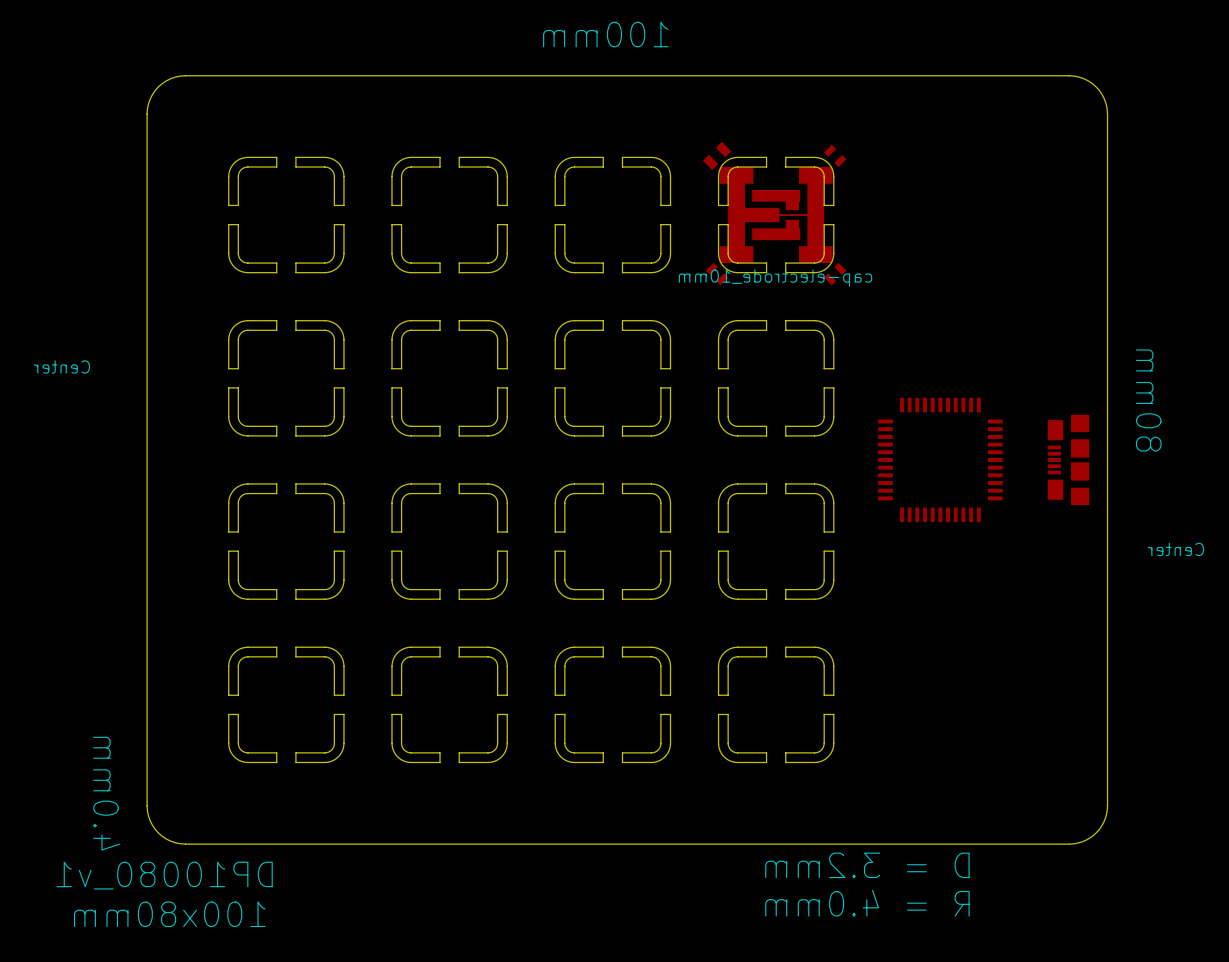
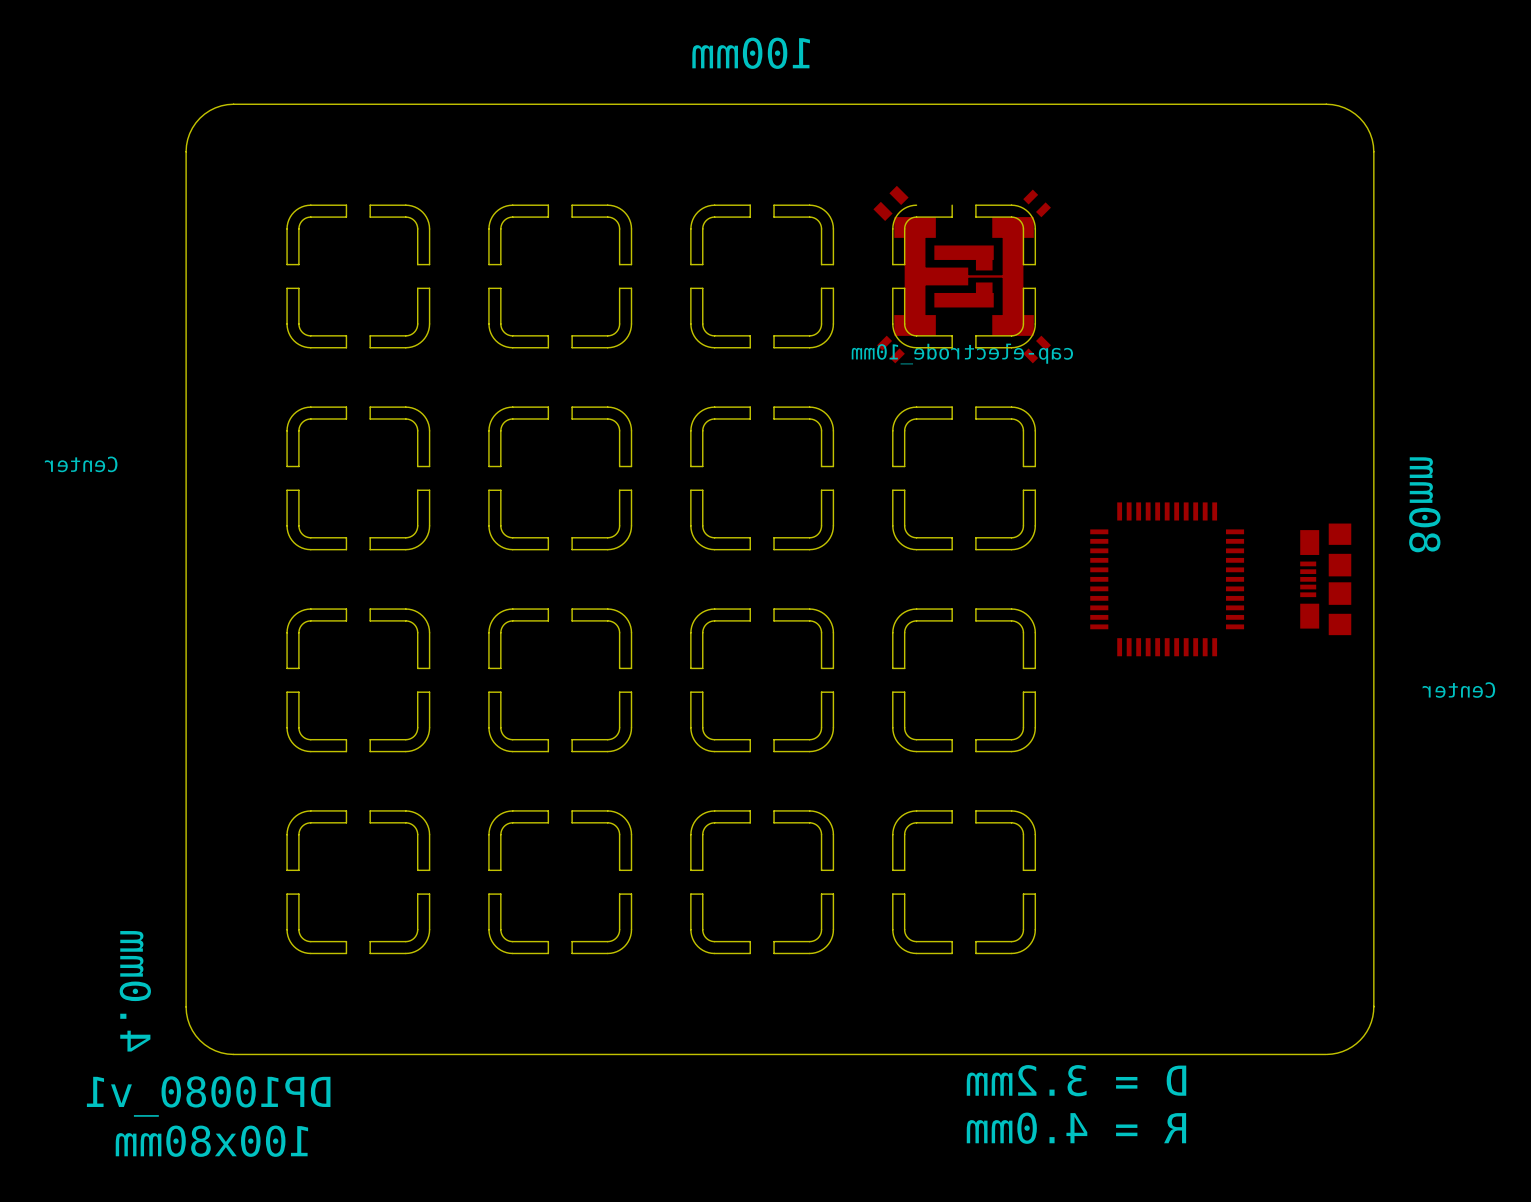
board edge: (766, 157) (737, 157) -> none

